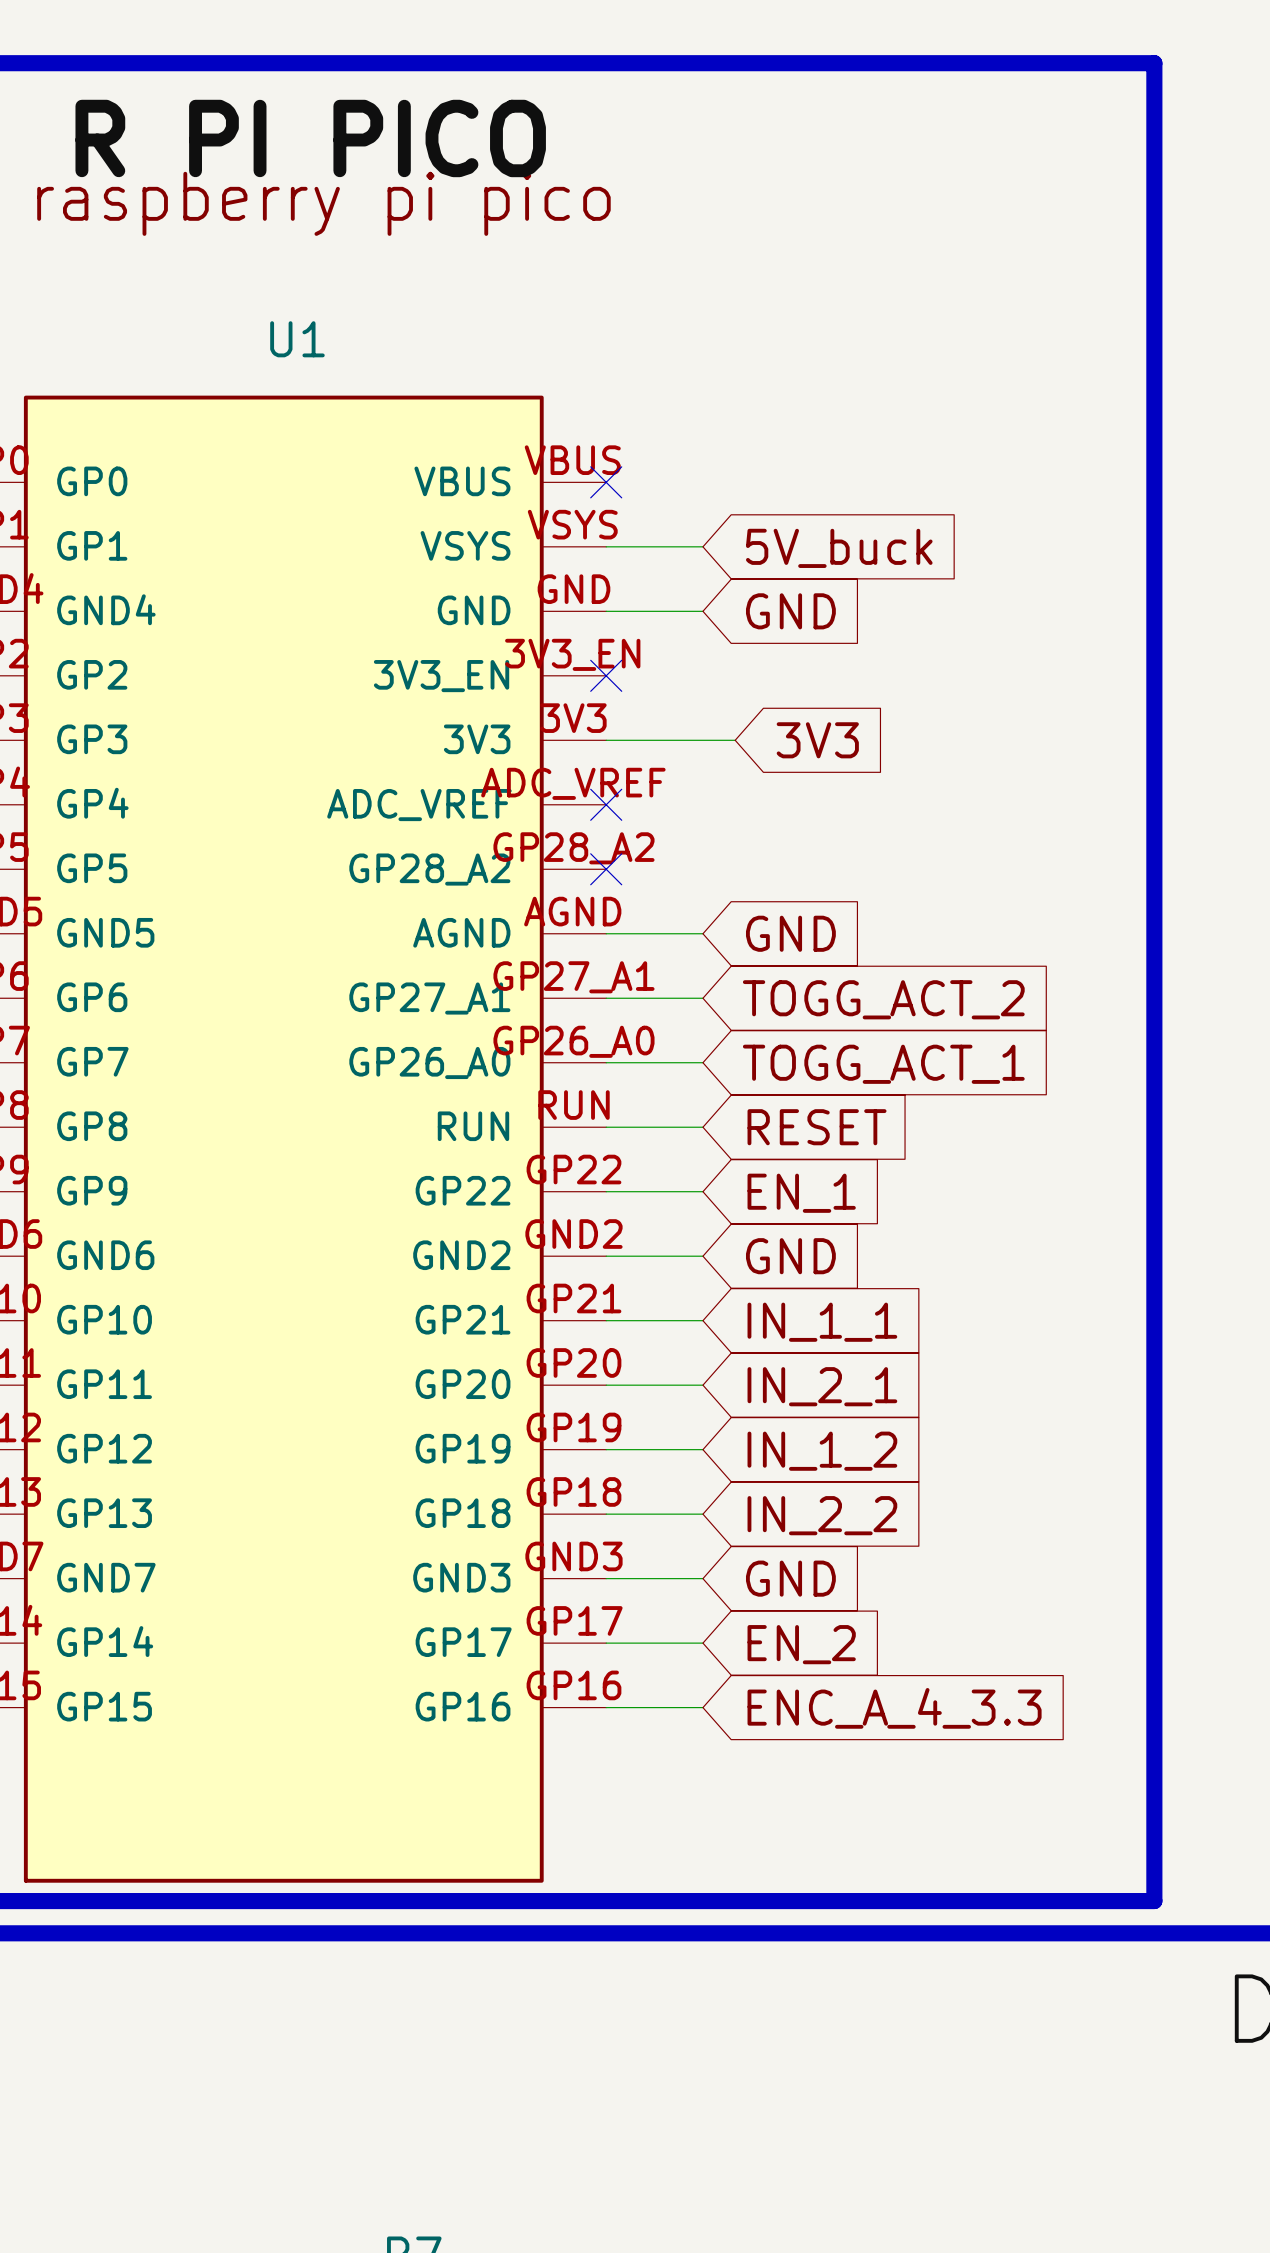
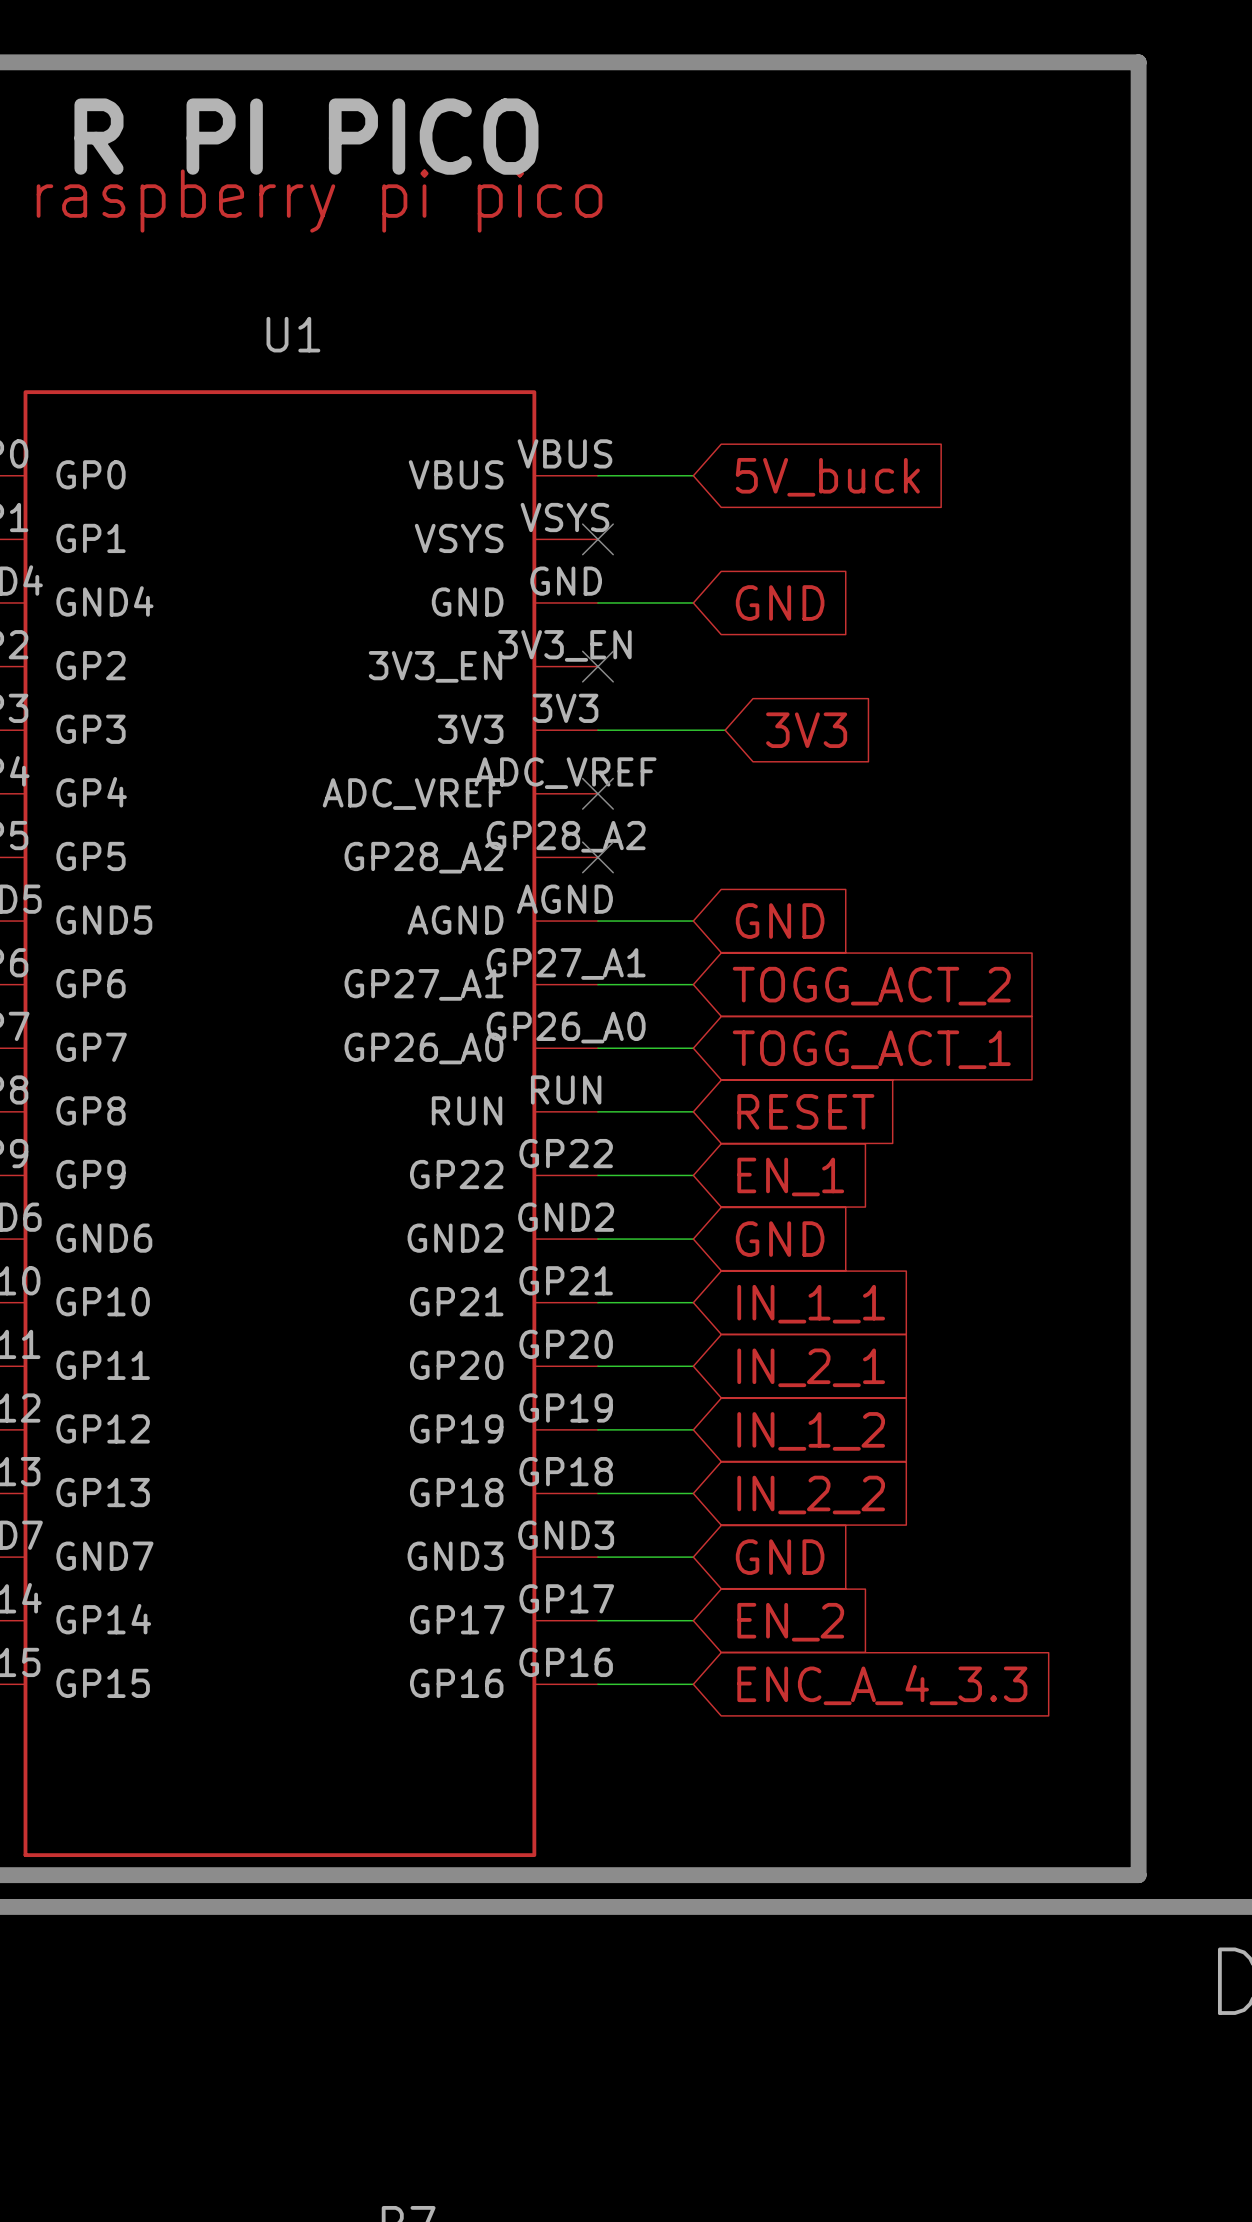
no-connect mark position: (606, 482) -> (597, 539)
wire: (606, 546) (702, 546) -> (597, 475) (693, 475)
global label position: 5V_buck (839, 548) -> 5V_buck (827, 477)

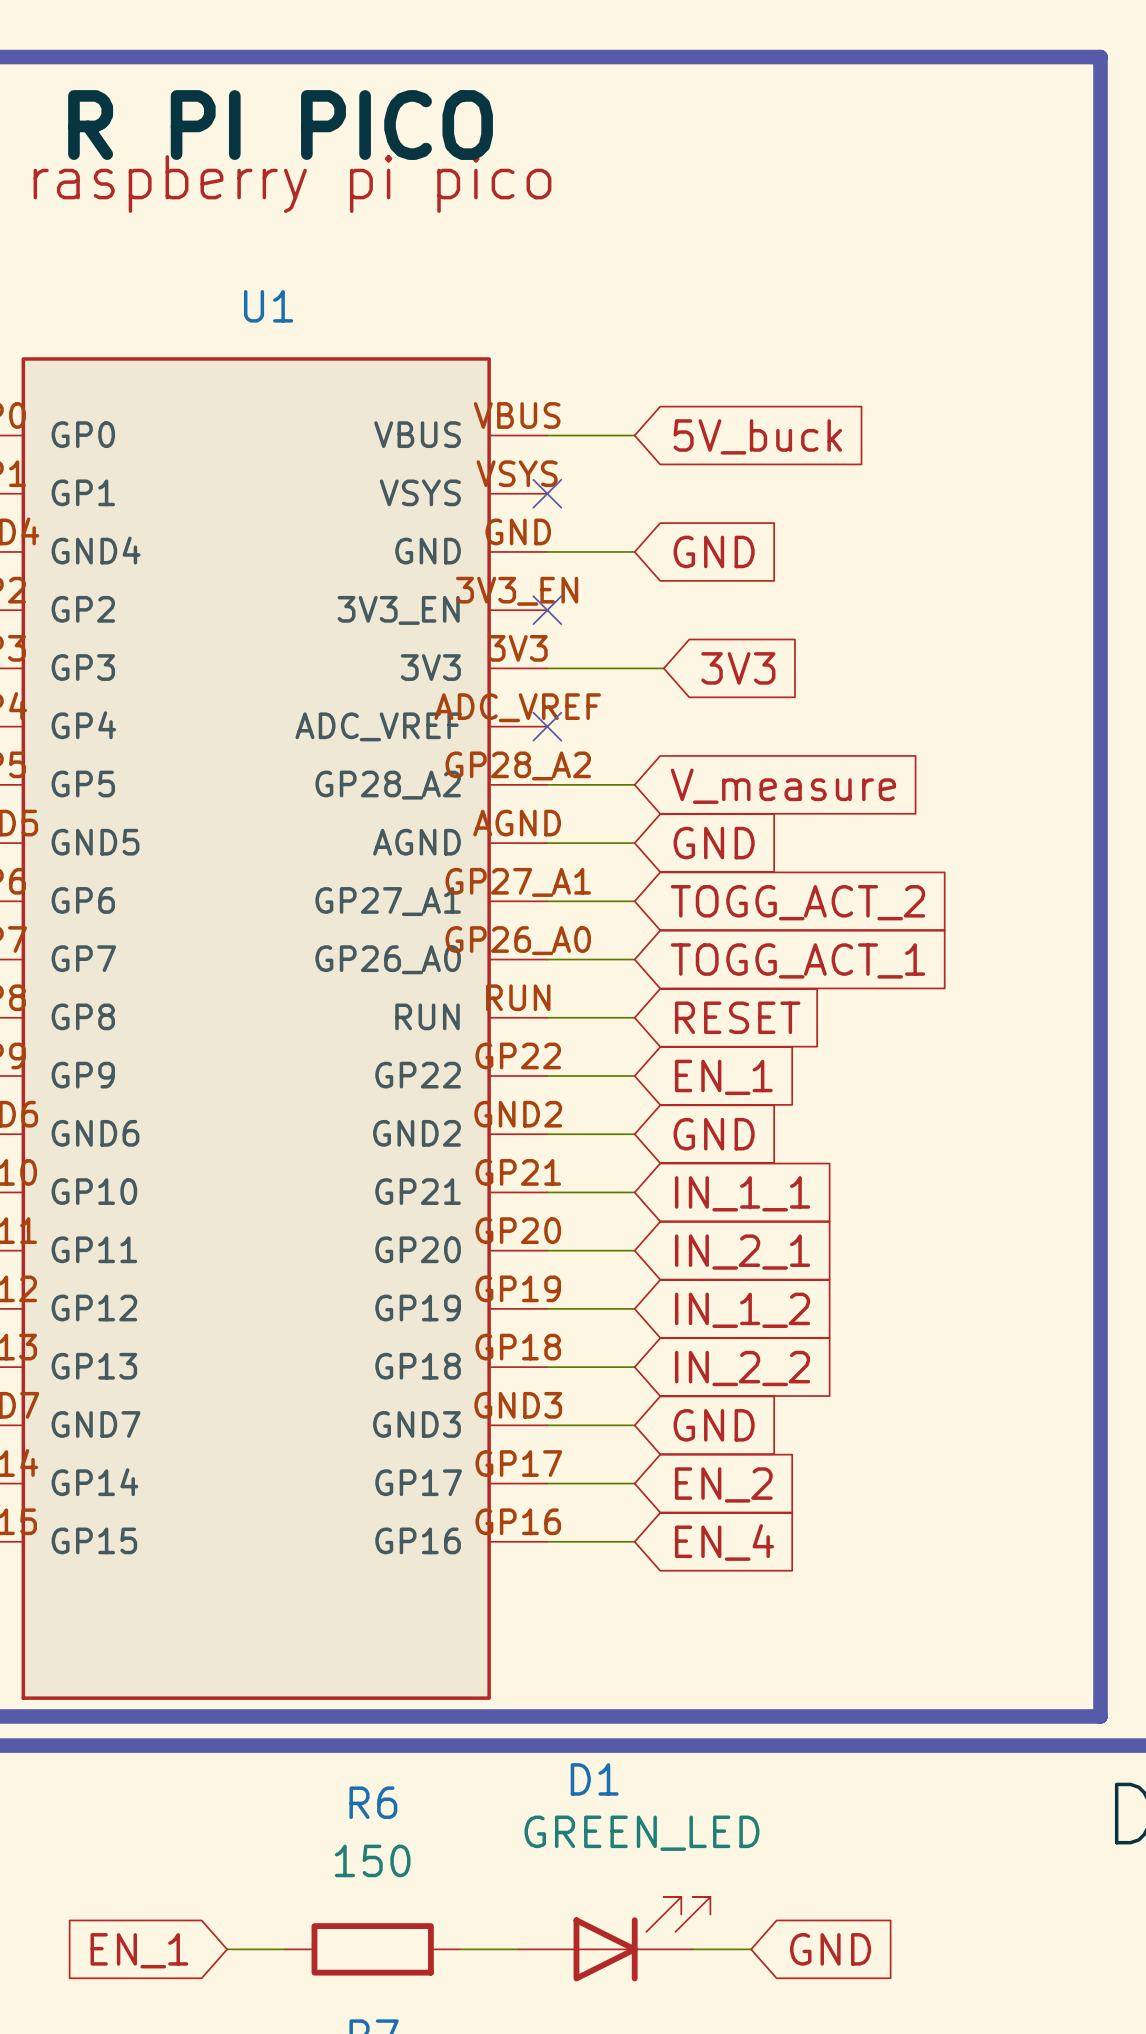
line: (1138, 62) (1138, 1875) -> (1042, 57) (1100, 57) (1100, 1716) (1042, 1716)
wire: none -> (547, 784) (634, 784)
no-connect mark: (597, 857) -> none
global label: none -> V_measure (783, 786)
global label: ENC_A_4_3.3 (882, 1685) -> EN_4 (724, 1542)
D1: none -> GREEN_LED (614, 1939)
wire: none -> (227, 1949) (285, 1949)
R6: none -> 150 (372, 1949)
wire: none -> (460, 1949) (518, 1949)
wire: none -> (692, 1949) (751, 1949)
global label: none -> GND (830, 1949)
global label: none -> EN_1 (139, 1950)

